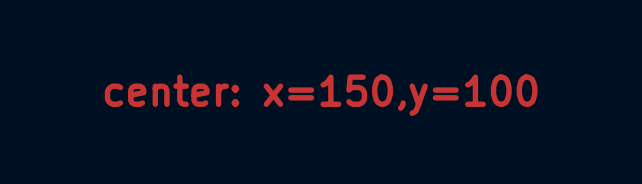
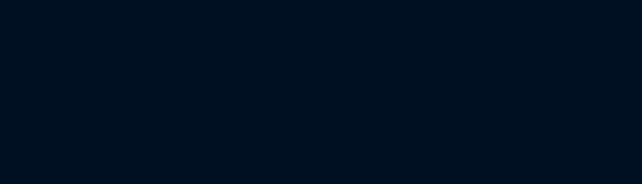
text: center: x=150,y=100 (321, 95) -> none

